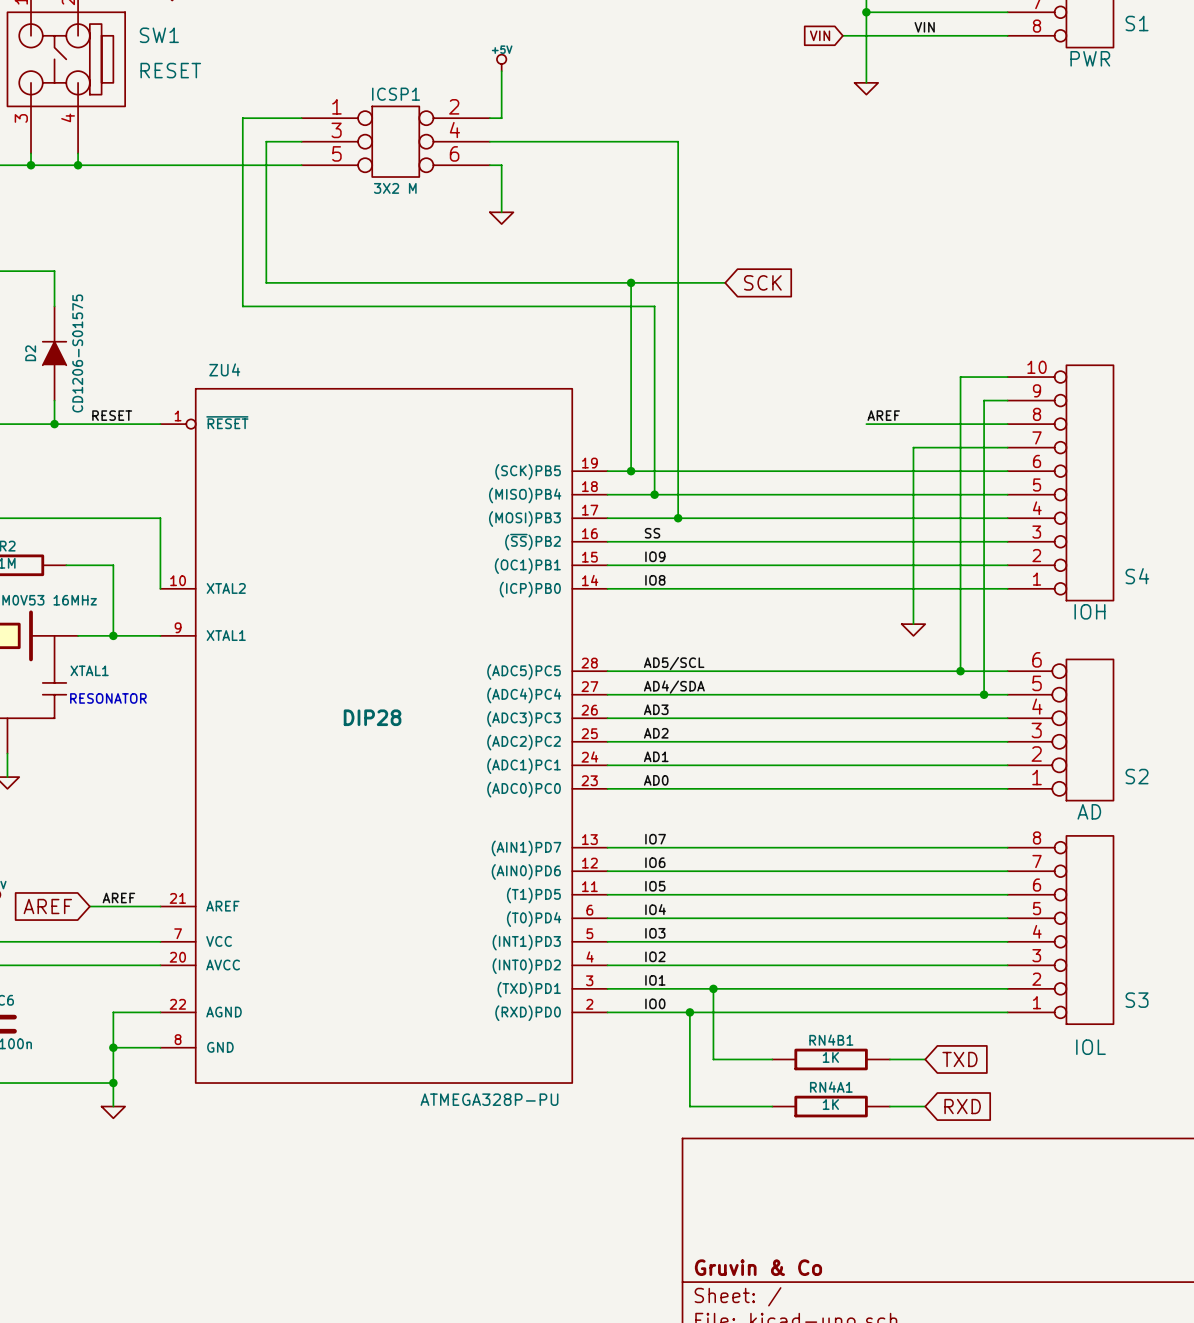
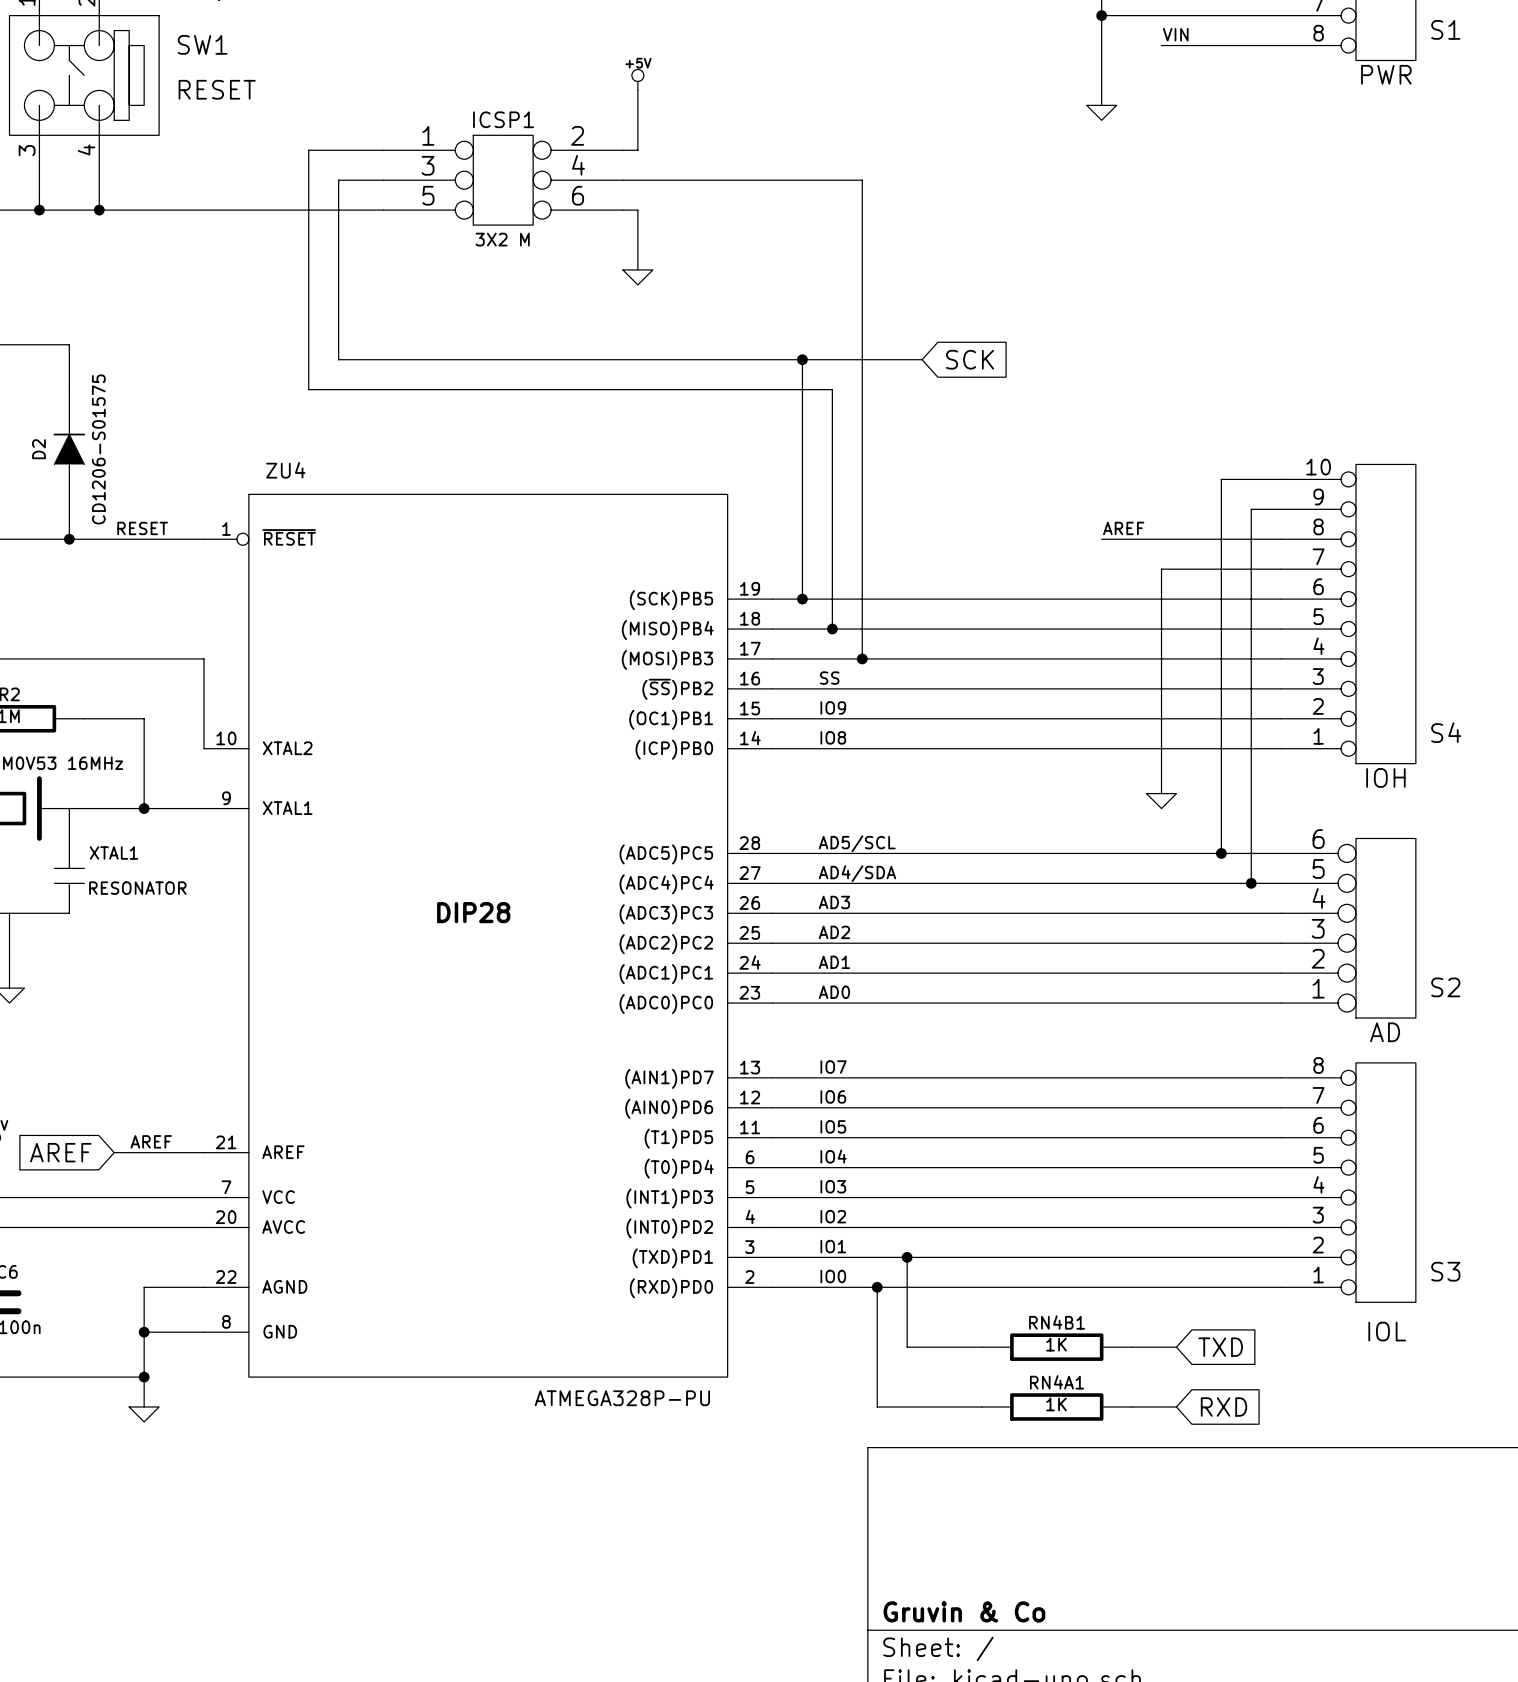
global label: VIN (820, 35) -> none
wire: (842, 35) (913, 35) -> none

